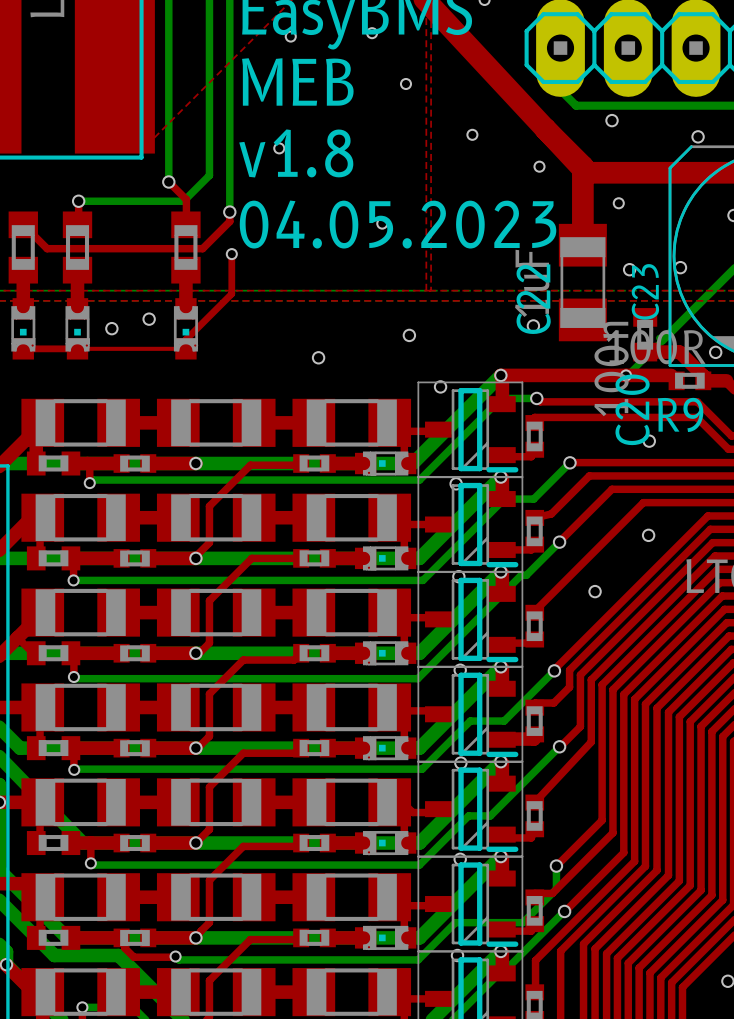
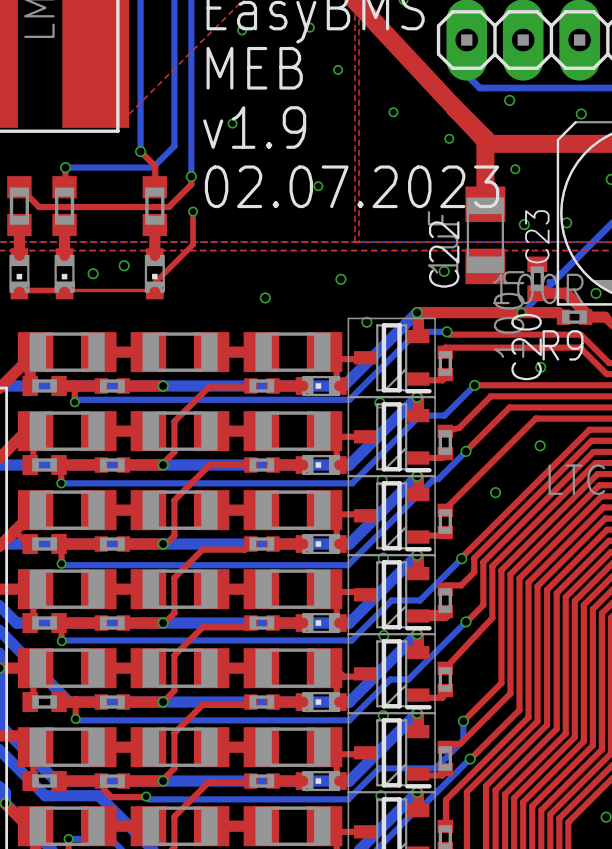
text: v1.8 (296, 153) -> v1.9 (254, 127)
text: 04.05.2023 (398, 224) -> 02.07.2023 (352, 186)

